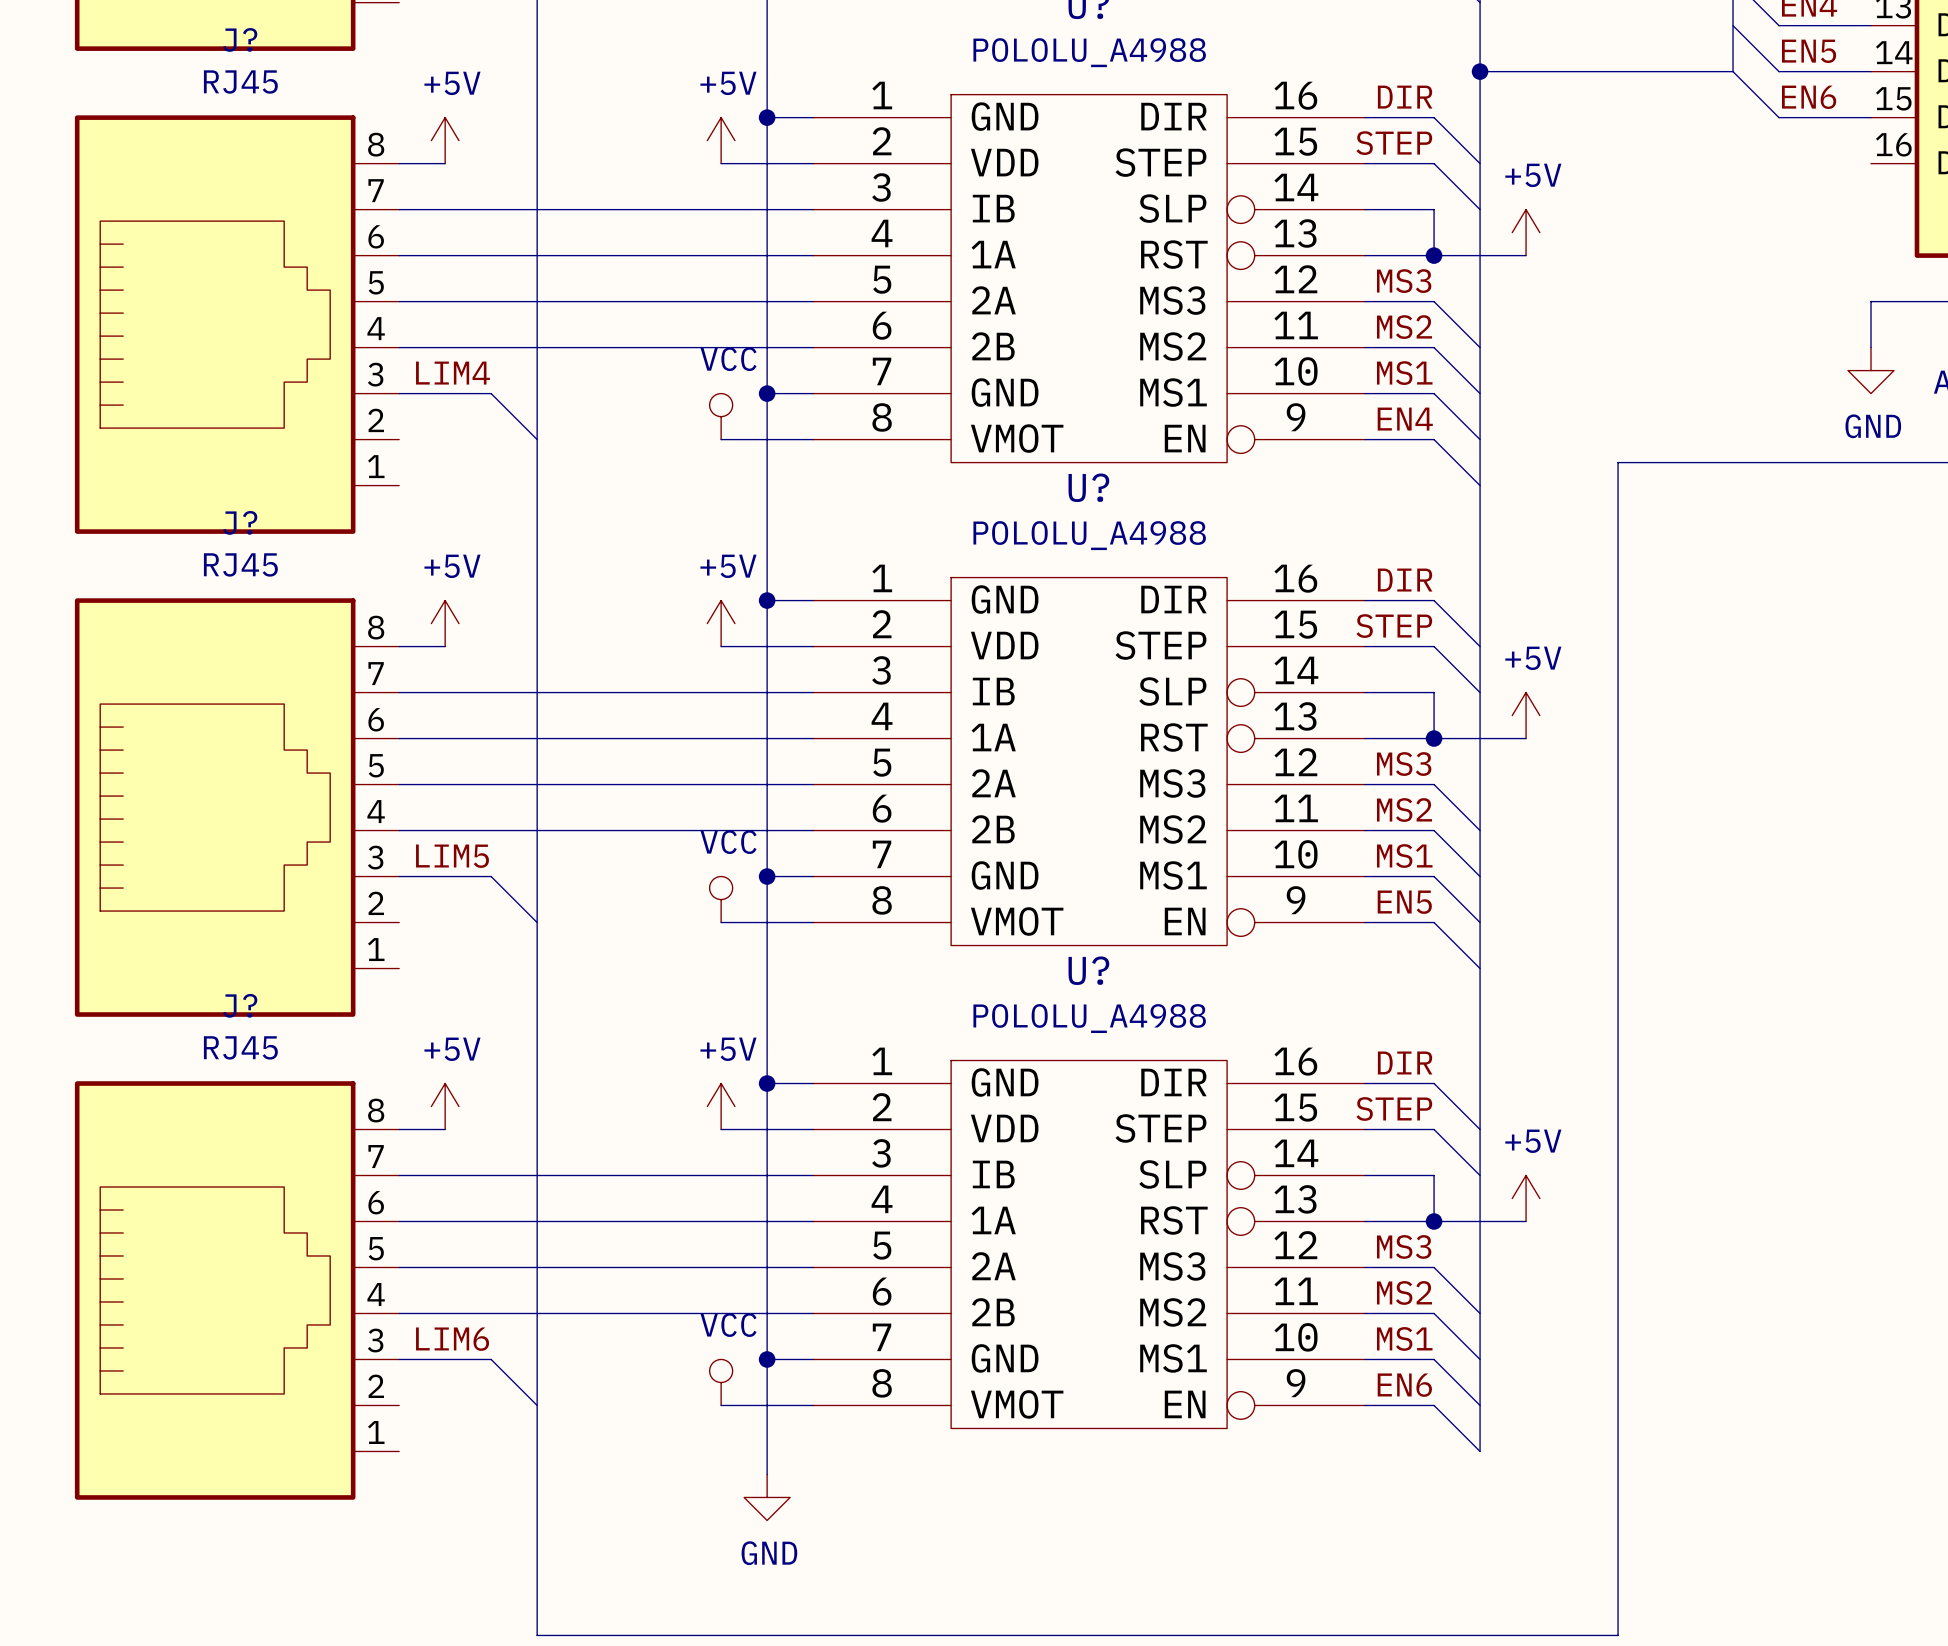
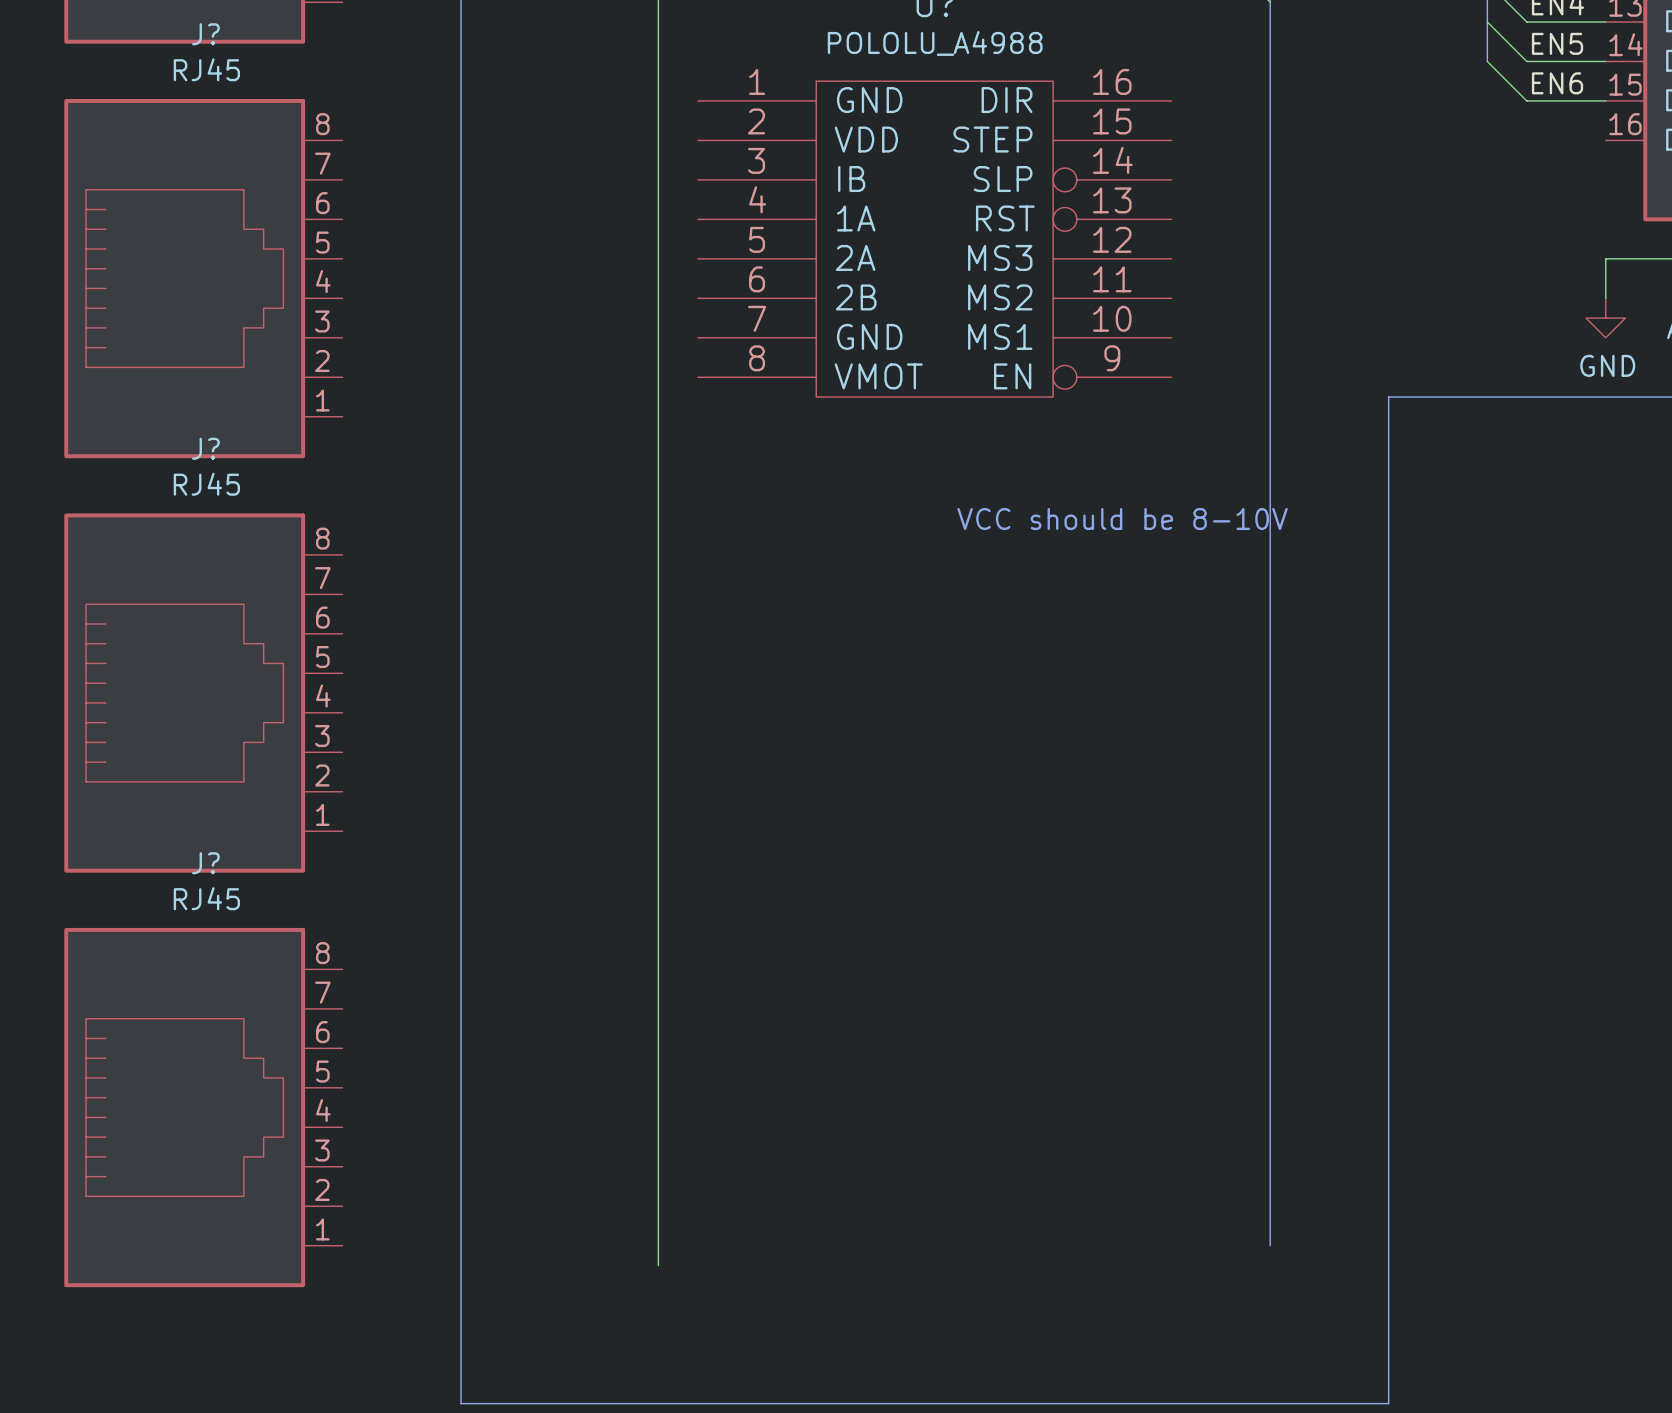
bus: (1480, 71) (1733, 71) -> none
junction: (1480, 71) -> none
label: DIR (1405, 97) -> none
wire: (767, 117) (813, 117) -> none
junction: (767, 117) -> none
wire: (1365, 117) (1434, 117) (1480, 163) -> none
power symbol: +5V (445, 140) -> none
power symbol: +5V (721, 140) -> none
label: STEP (1394, 143) -> none
wire: (399, 163) (445, 163) -> none
wire: (721, 163) (813, 163) -> none
wire: (1365, 163) (1434, 163) (1480, 209) -> none
wire: (399, 209) (813, 209) -> none
wire: (1365, 209) (1434, 209) (1434, 255) -> none
power symbol: +5V (1526, 232) -> none
wire: (399, 255) (813, 255) -> none
wire: (1365, 255) (1526, 255) -> none
junction: (1434, 255) -> none
label: MS3 (1404, 281) -> none
wire: (399, 301) (813, 301) -> none
wire: (1365, 301) (1434, 301) (1480, 347) -> none
label: MS2 (1404, 327) -> none
wire: (399, 347) (813, 347) -> none
wire: (1365, 347) (1434, 347) (1480, 393) -> none
label: LIM4 (452, 373) -> none
label: MS1 (1404, 373) -> none
wire: (399, 393) (491, 393) (537, 439) -> none
wire: (767, 393) (813, 393) -> none
junction: (767, 393) -> none
wire: (1365, 393) (1434, 393) (1480, 439) -> none
power symbol: VCC (721, 416) -> none
label: EN4 (1405, 419) -> none
wire: (721, 439) (813, 439) -> none
wire: (1365, 439) (1434, 439) (1480, 485) -> none
label: DIR (1405, 580) -> none
wire: (767, 600) (813, 600) -> none
junction: (767, 600) -> none
wire: (1365, 600) (1434, 600) (1480, 646) -> none
text: none -> VCC should be 8-10V (1122, 519)
power symbol: +5V (445, 623) -> none
power symbol: +5V (721, 623) -> none
label: STEP (1394, 626) -> none
wire: (399, 646) (445, 646) -> none
wire: (721, 646) (813, 646) -> none
wire: (1365, 646) (1434, 646) (1480, 692) -> none
wire: (399, 692) (813, 692) -> none
wire: (1365, 692) (1434, 692) (1434, 738) -> none
power symbol: +5V (1526, 715) -> none
wire: (399, 738) (813, 738) -> none
wire: (1365, 738) (1526, 738) -> none
junction: (1434, 738) -> none
U?: POLOLU_A4988 (1089, 761) -> none
label: MS3 (1404, 764) -> none
wire: (399, 784) (813, 784) -> none
wire: (1365, 784) (1434, 784) (1480, 830) -> none
label: MS2 (1404, 810) -> none
wire: (399, 830) (813, 830) -> none
wire: (1365, 830) (1434, 830) (1480, 876) -> none
label: LIM5 (452, 856) -> none
label: MS1 (1404, 856) -> none
wire: (399, 876) (491, 876) (537, 922) -> none
wire: (767, 876) (813, 876) -> none
junction: (767, 876) -> none
wire: (1365, 876) (1434, 876) (1480, 922) -> none
power symbol: VCC (721, 899) -> none
label: EN5 (1404, 902) -> none
wire: (721, 922) (813, 922) -> none
wire: (1365, 922) (1434, 922) (1480, 968) -> none
label: DIR (1405, 1062) -> none
wire: (767, 1083) (813, 1083) -> none
junction: (767, 1083) -> none
wire: (1365, 1083) (1434, 1083) (1480, 1129) -> none
power symbol: +5V (445, 1106) -> none
power symbol: +5V (721, 1106) -> none
label: STEP (1394, 1108) -> none
wire: (399, 1129) (445, 1129) -> none
wire: (721, 1129) (813, 1129) -> none
wire: (1365, 1129) (1434, 1129) (1480, 1175) -> none
wire: (399, 1175) (813, 1175) -> none
wire: (1365, 1175) (1434, 1175) (1434, 1221) -> none
power symbol: +5V (1526, 1198) -> none
wire: (399, 1221) (813, 1221) -> none
wire: (1365, 1221) (1526, 1221) -> none
junction: (1434, 1221) -> none
U?: POLOLU_A4988 (1089, 1244) -> none
label: MS3 (1404, 1246) -> none
wire: (399, 1267) (813, 1267) -> none
wire: (1365, 1267) (1434, 1267) (1480, 1313) -> none
label: MS2 (1404, 1292) -> none
wire: (399, 1313) (813, 1313) -> none
wire: (1365, 1313) (1434, 1313) (1480, 1359) -> none
label: MS1 (1404, 1338) -> none
label: LIM6 (452, 1339) -> none
wire: (399, 1359) (491, 1359) (537, 1405) -> none
wire: (767, 1359) (813, 1359) -> none
junction: (767, 1359) -> none
wire: (1365, 1359) (1434, 1359) (1480, 1405) -> none
power symbol: VCC (721, 1382) -> none
label: EN6 (1404, 1385) -> none
wire: (721, 1405) (813, 1405) -> none
wire: (1365, 1405) (1434, 1405) (1480, 1451) -> none
power symbol: GND (767, 1497) -> none

